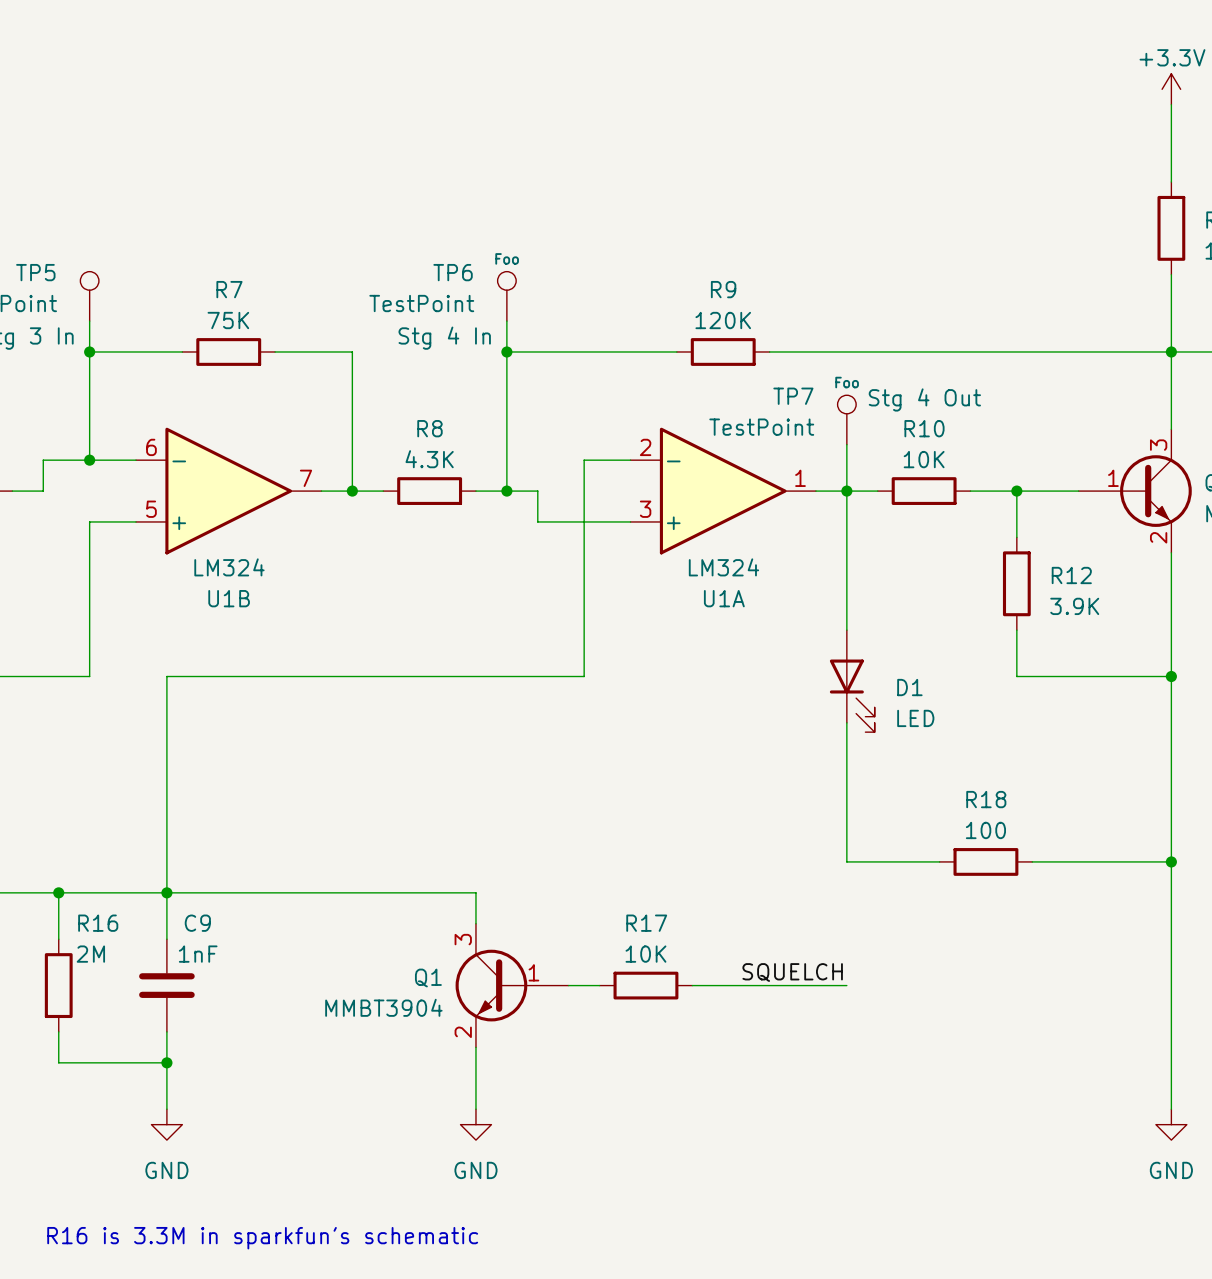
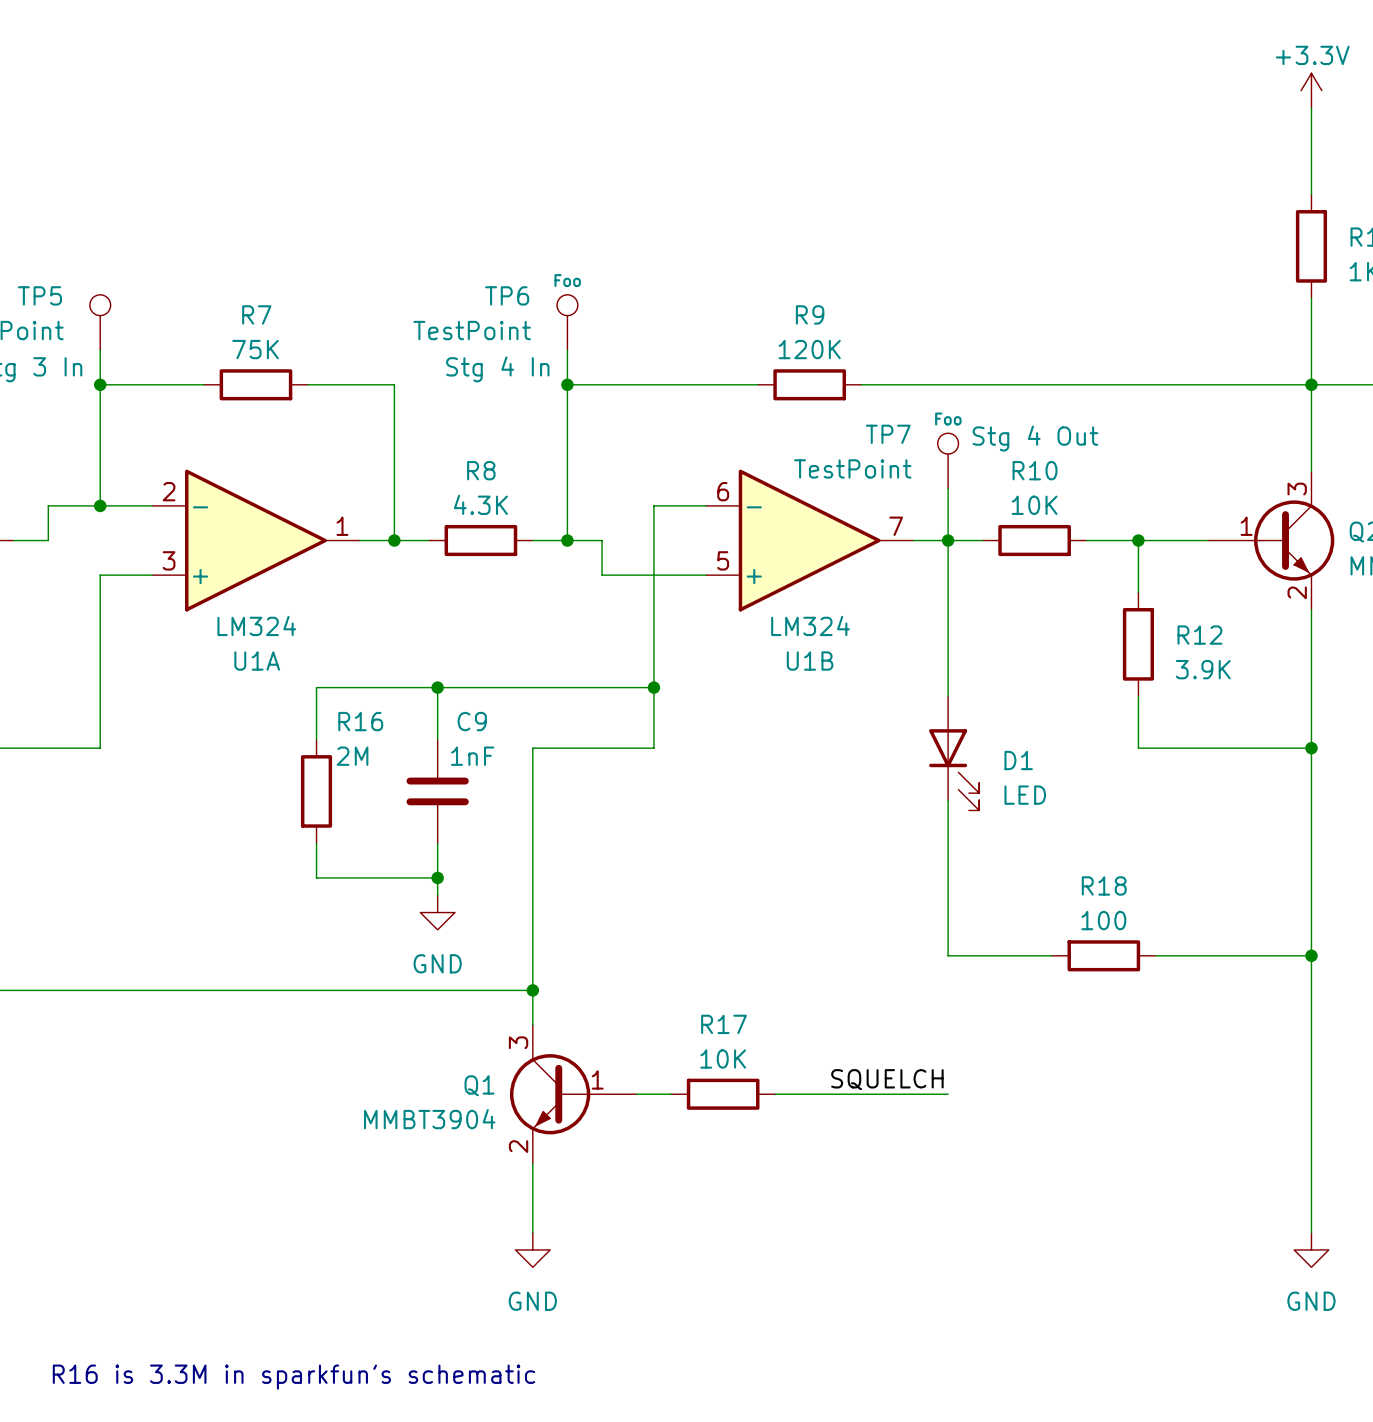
U1B position: (228, 491) -> (809, 540)
U1A position: (723, 491) -> (255, 540)
wire: none -> (437, 687) (437, 739)
junction: none -> (437, 687)
wire: none -> (653, 687) (316, 687) (316, 739)
junction: none -> (653, 687)
wire: (475, 676) (166, 676) (166, 939) -> (532, 748) (532, 990)
wire: none -> (316, 843) (316, 877) (437, 877)
wire: none -> (437, 843) (437, 895)
junction: none -> (437, 877)
power symbol: none -> GND (437, 912)
wire: (58, 892) (58, 939) -> none
junction: (58, 892) -> none
junction: (166, 892) -> none
junction: none -> (532, 990)
R16 position: (58, 985) -> (316, 791)
C9 position: (166, 985) -> (437, 791)
wire: (58, 1031) (58, 1062) (166, 1062) -> none
wire: (166, 1031) (166, 1109) -> none
junction: (166, 1062) -> none
power symbol: GND (166, 1124) -> none

